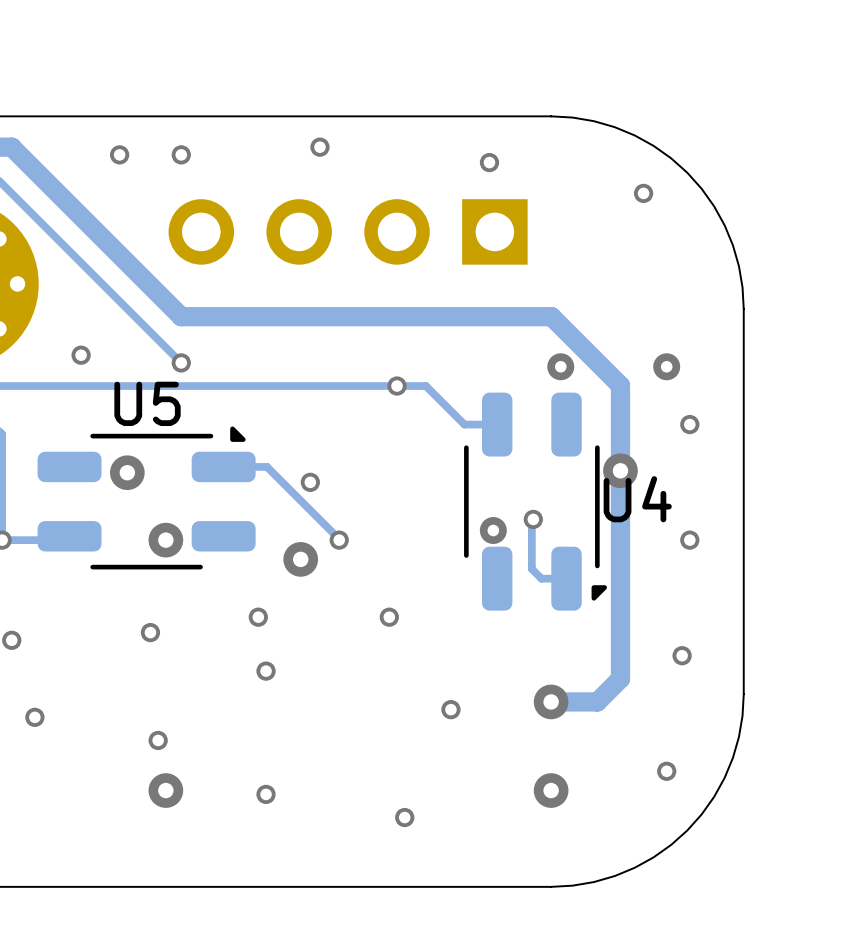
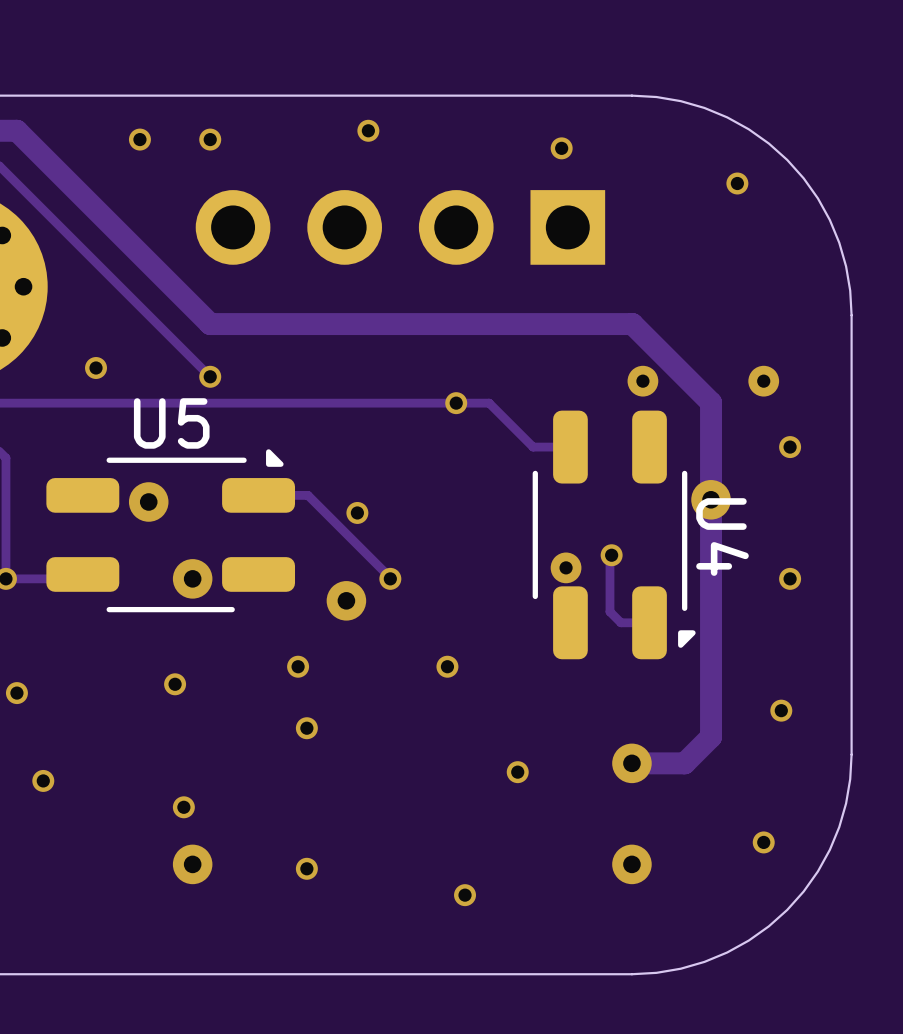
U4 name rotation: 0° (637, 499) -> 90° clockwise (722, 537)

